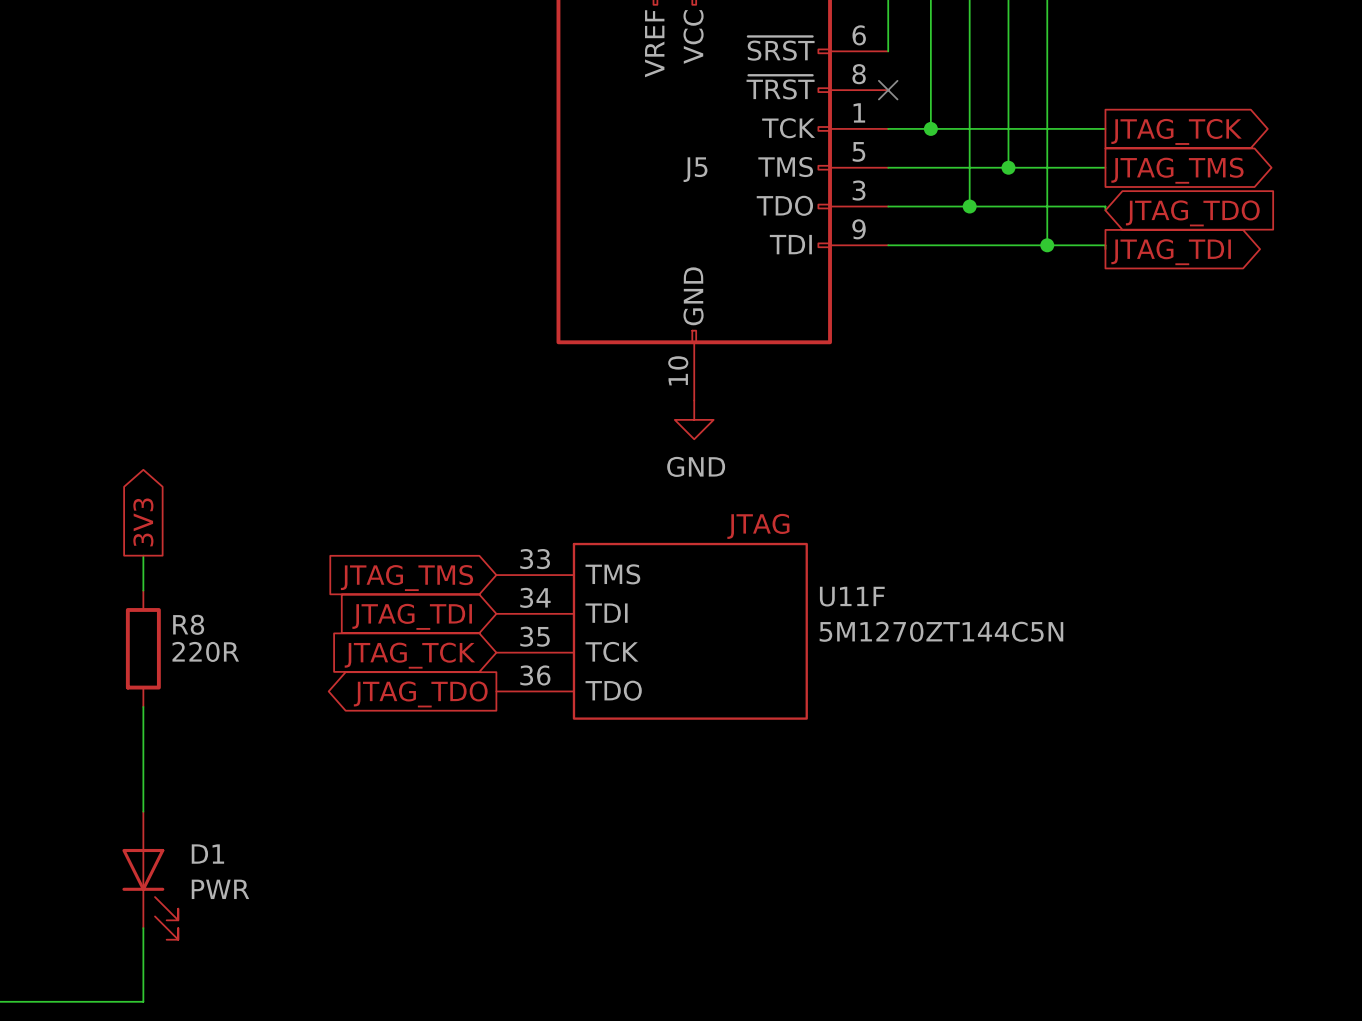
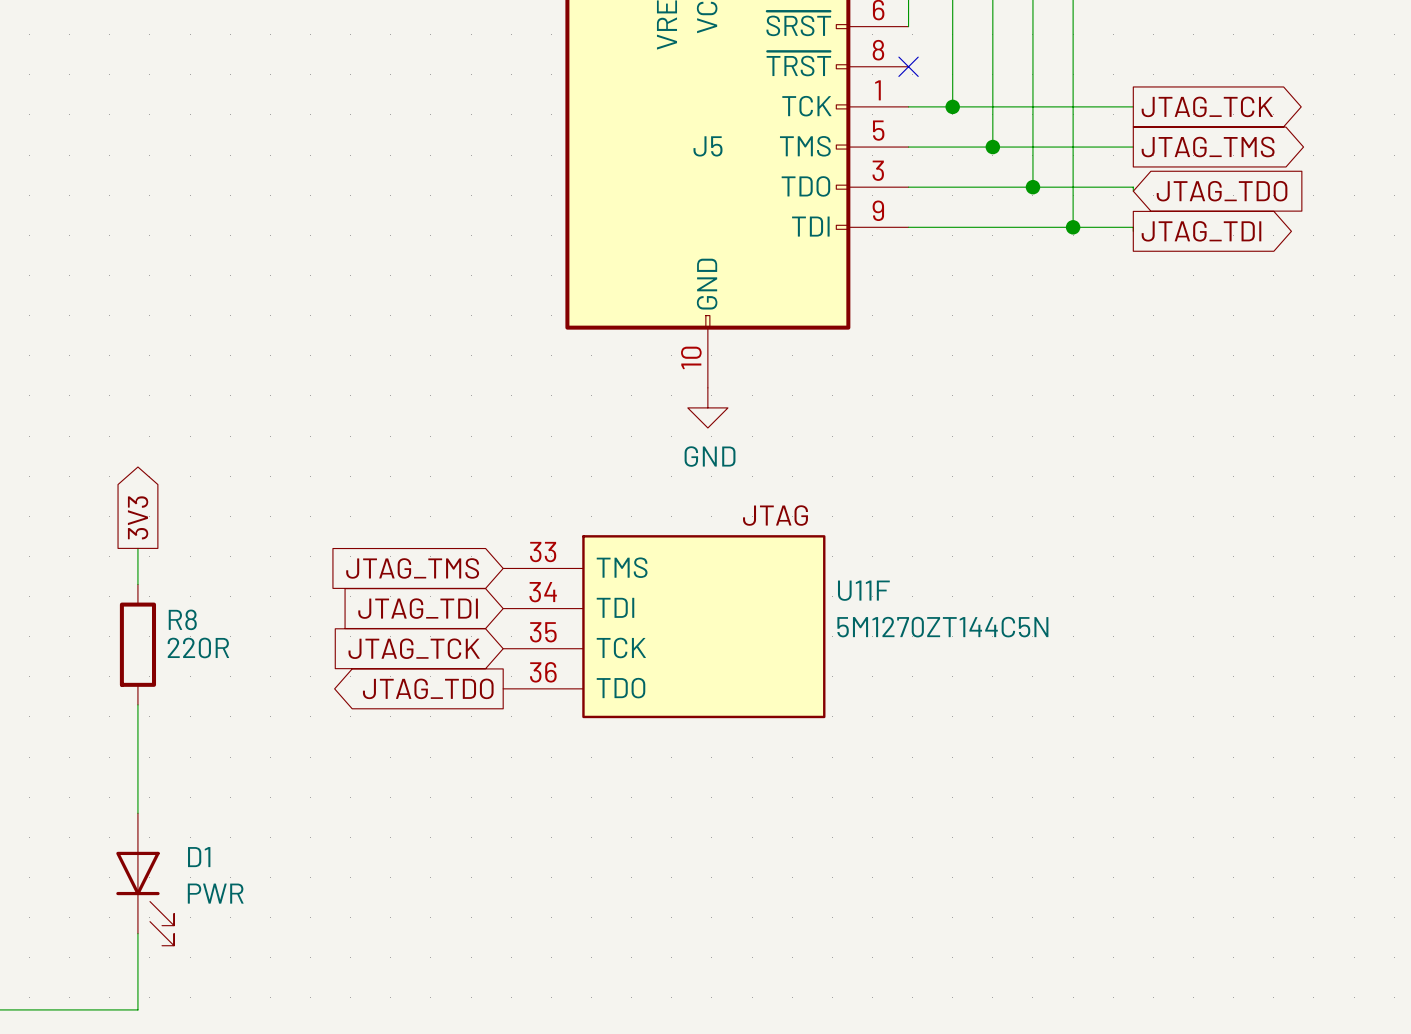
wire: (969, 167) (969, 206) -> (1032, 147) (1032, 187)
junction: none -> (992, 147)
junction: (1008, 167) -> none
junction: (969, 206) -> none
junction: none -> (1032, 187)

